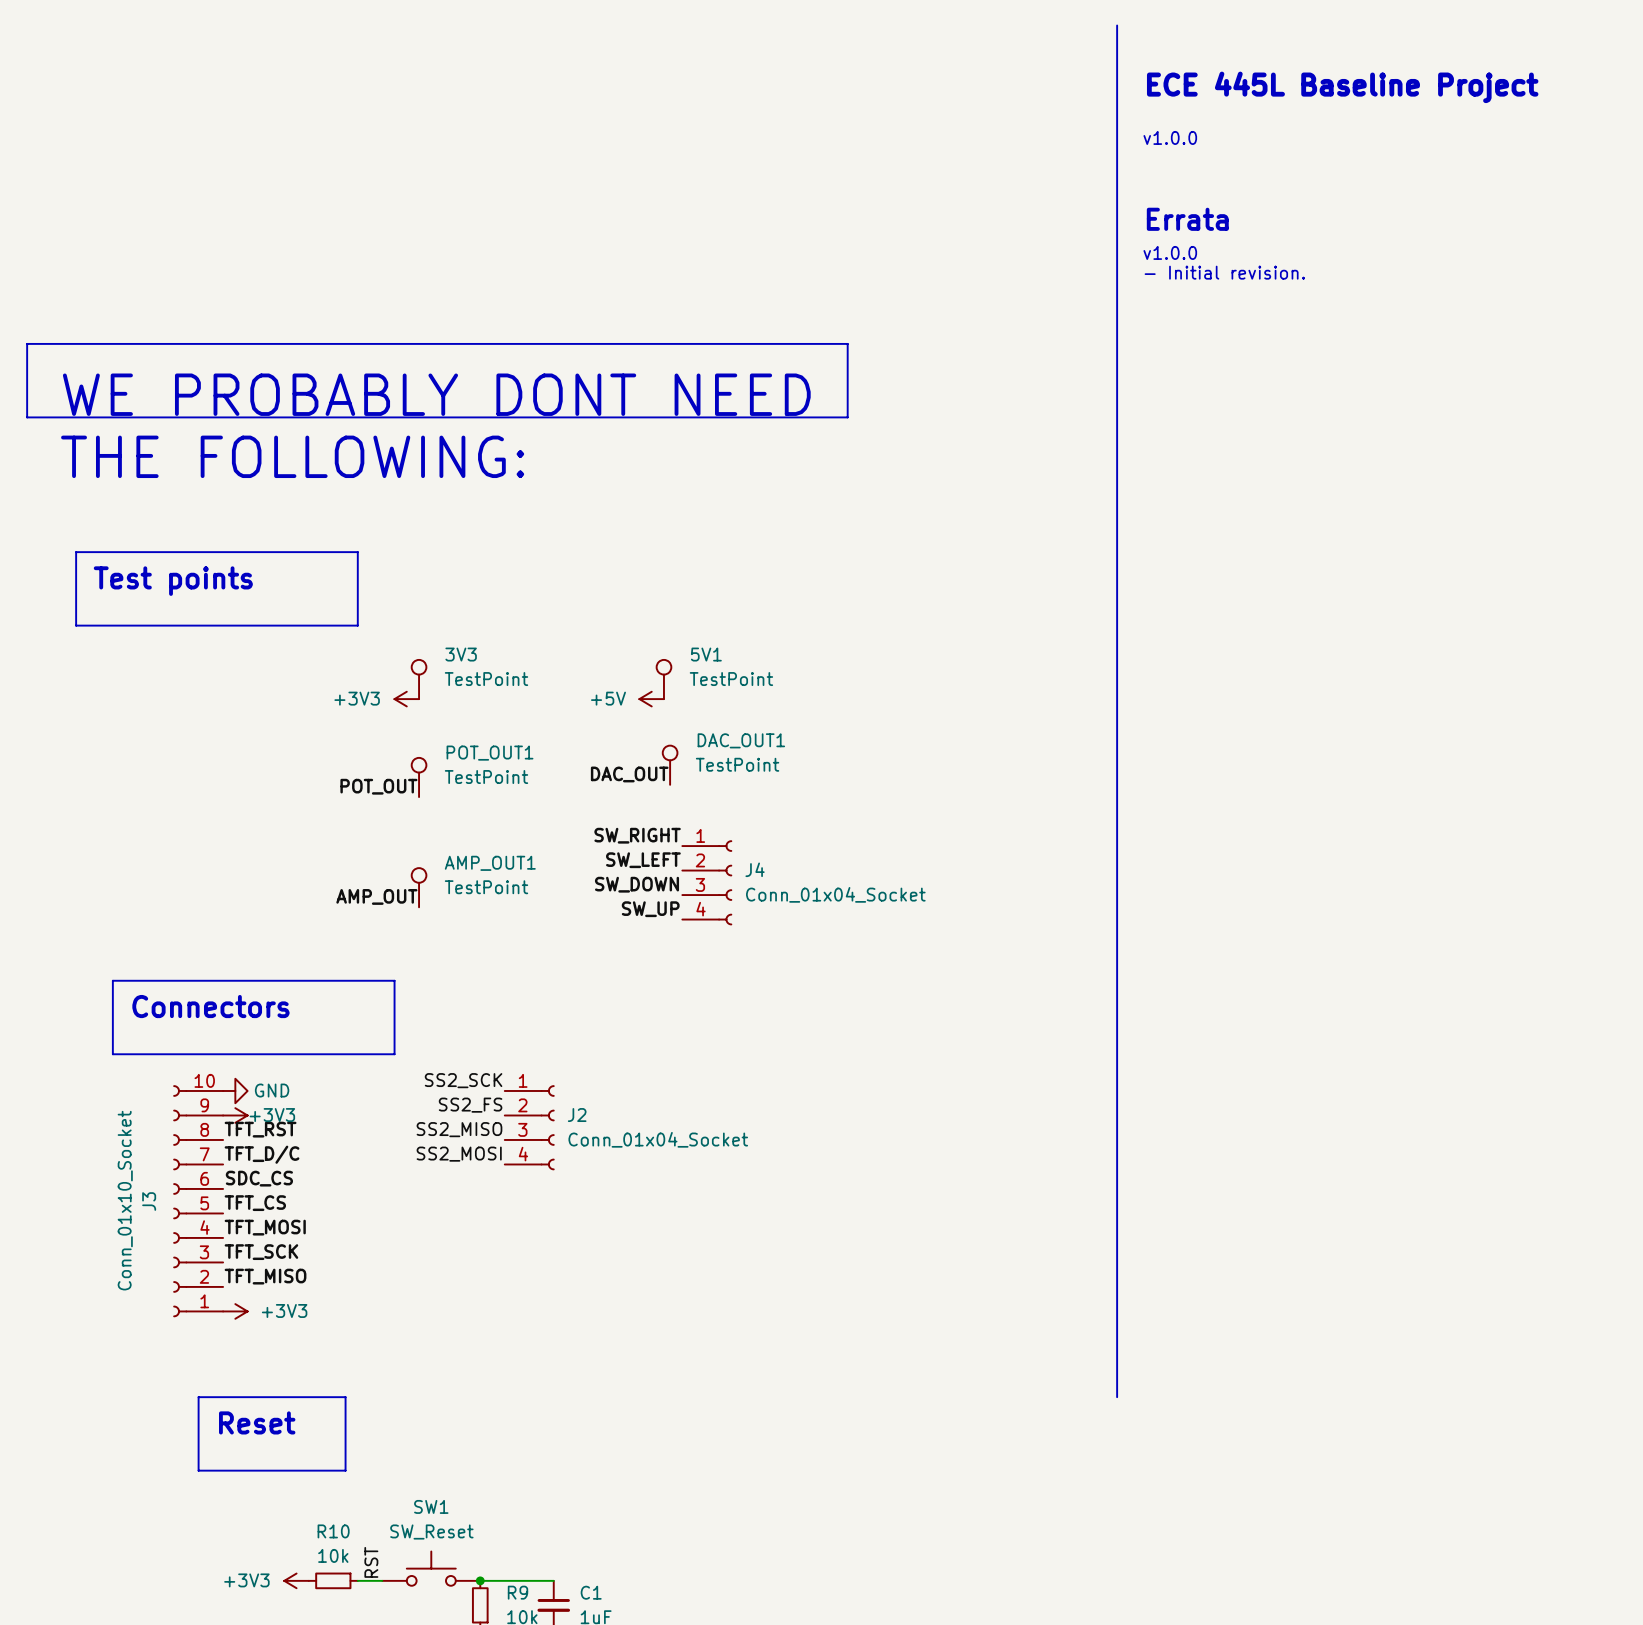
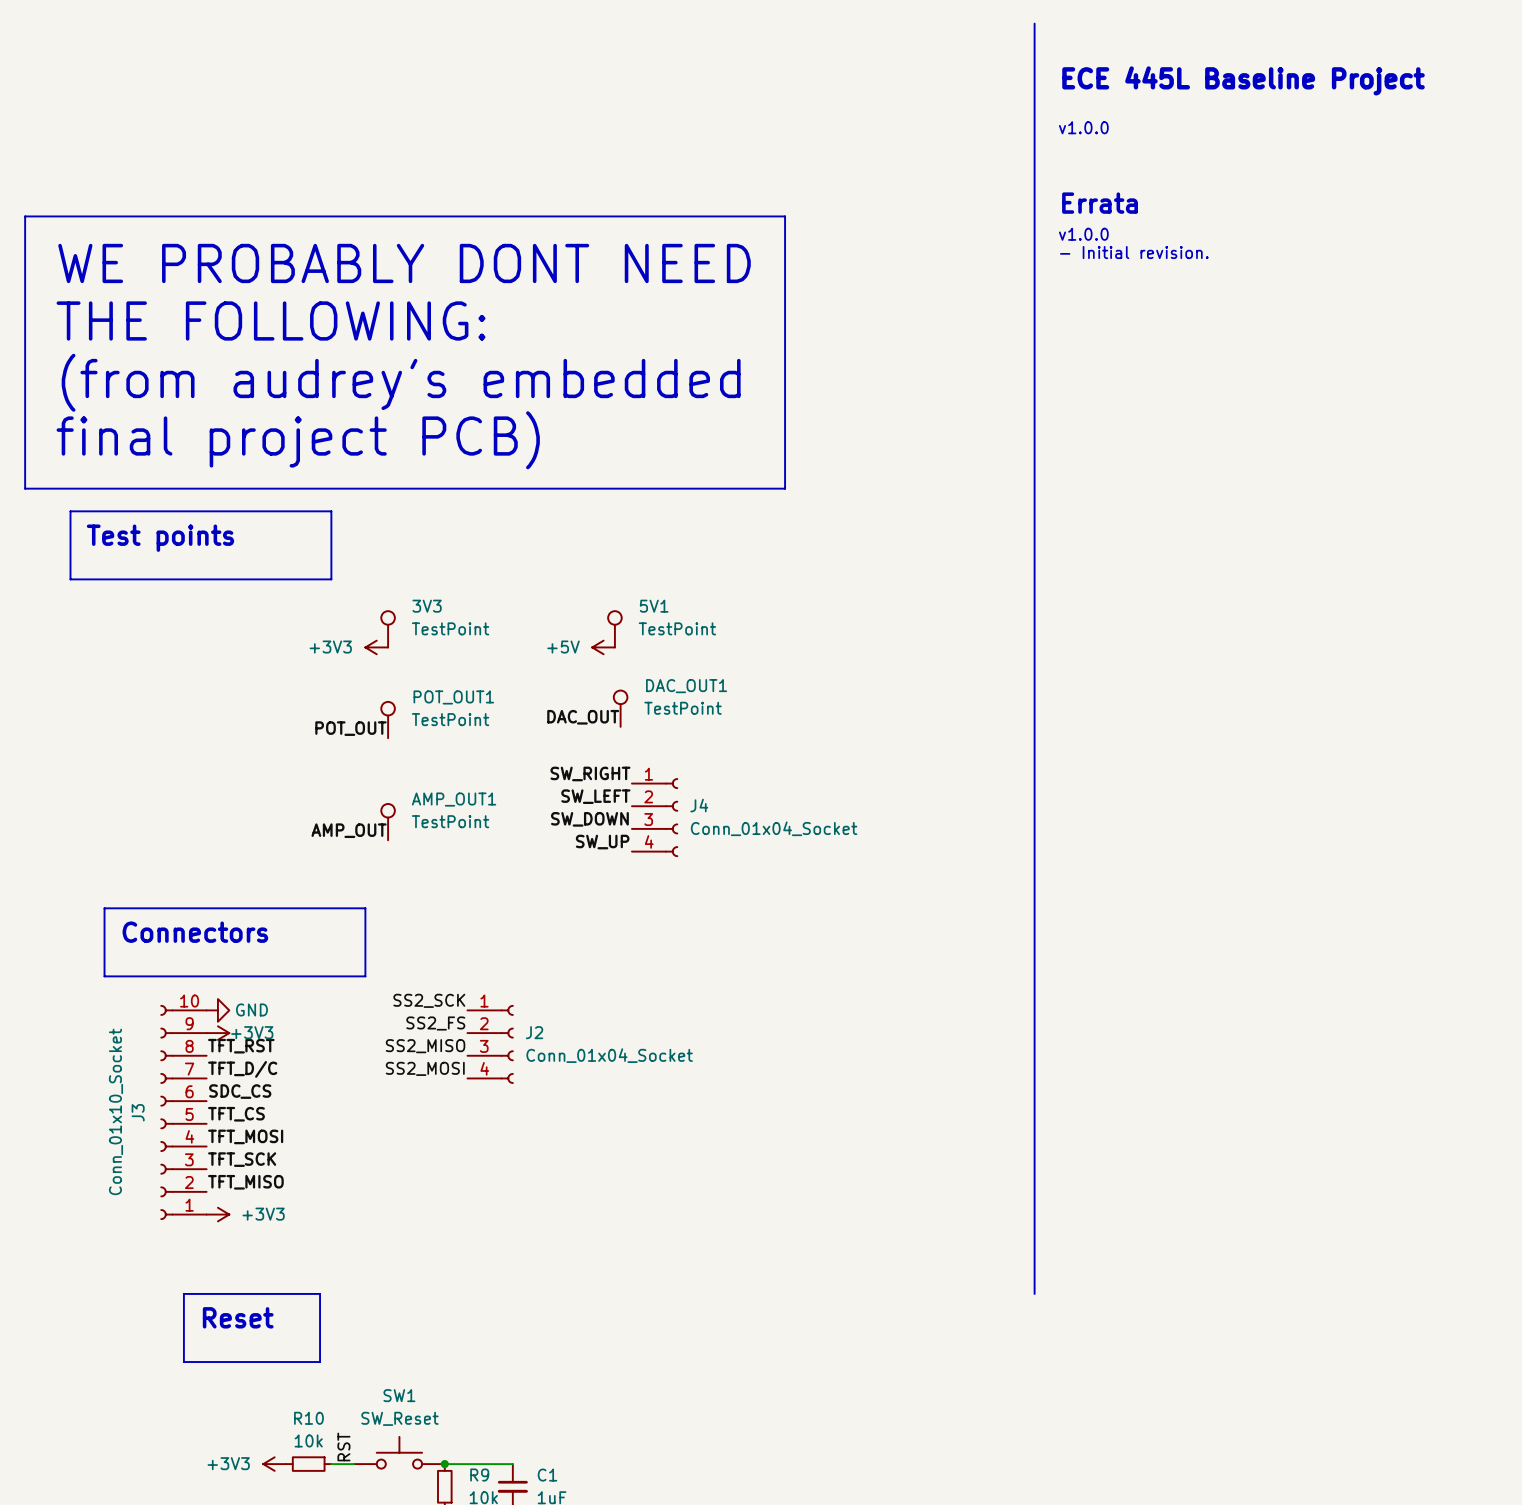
line: (27, 343) (847, 343) -> (25, 318) (25, 216) (785, 216) (785, 318)
text position: WE PROBABLY DONT NEED (436, 394) -> WE PROBABLY DONT NEED (404, 263)
text: none -> (from audrey's embedded (401, 382)
line: (27, 417) (847, 417) -> (25, 386) (25, 488) (785, 488) (785, 386)
text position: THE FOLLOWING: (292, 456) -> THE FOLLOWING: (271, 320)
text: none -> final project PCB) (298, 440)

